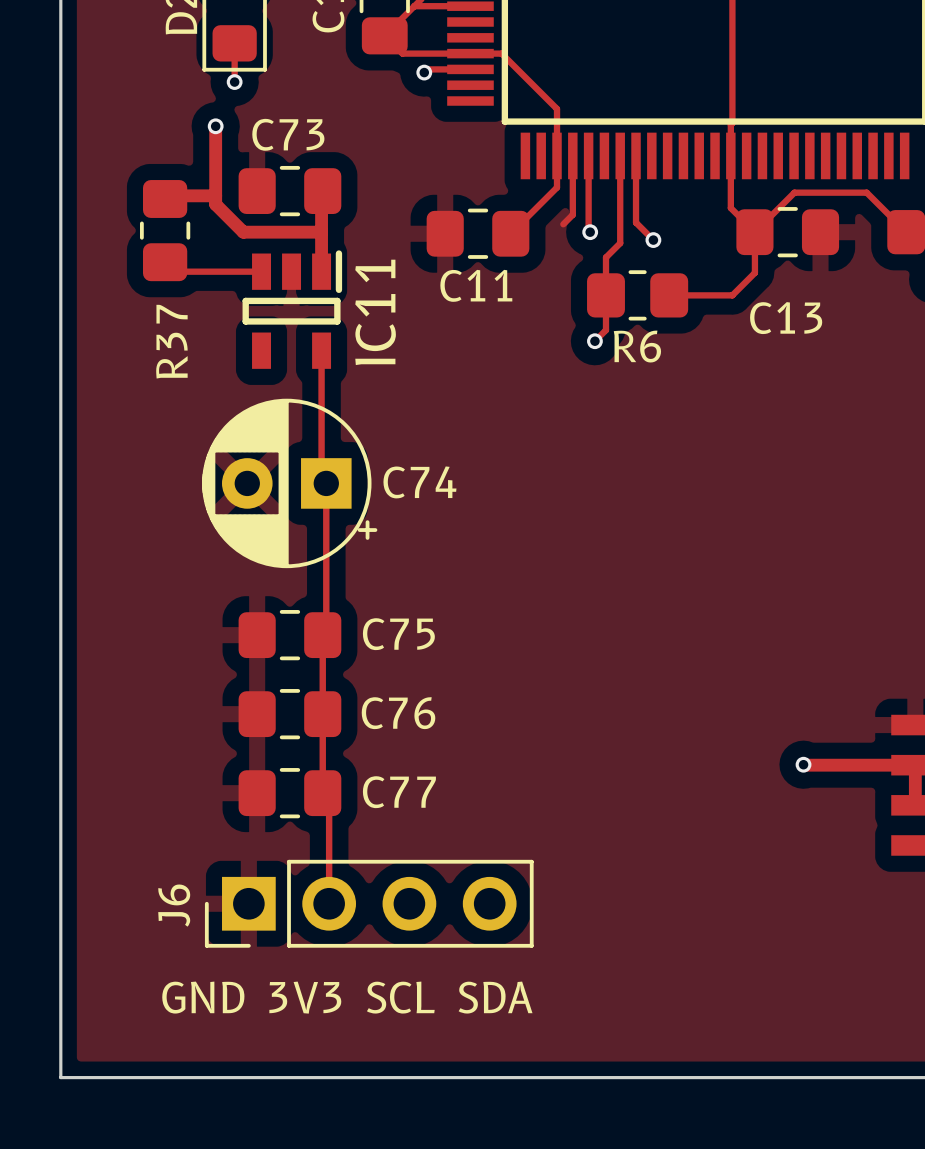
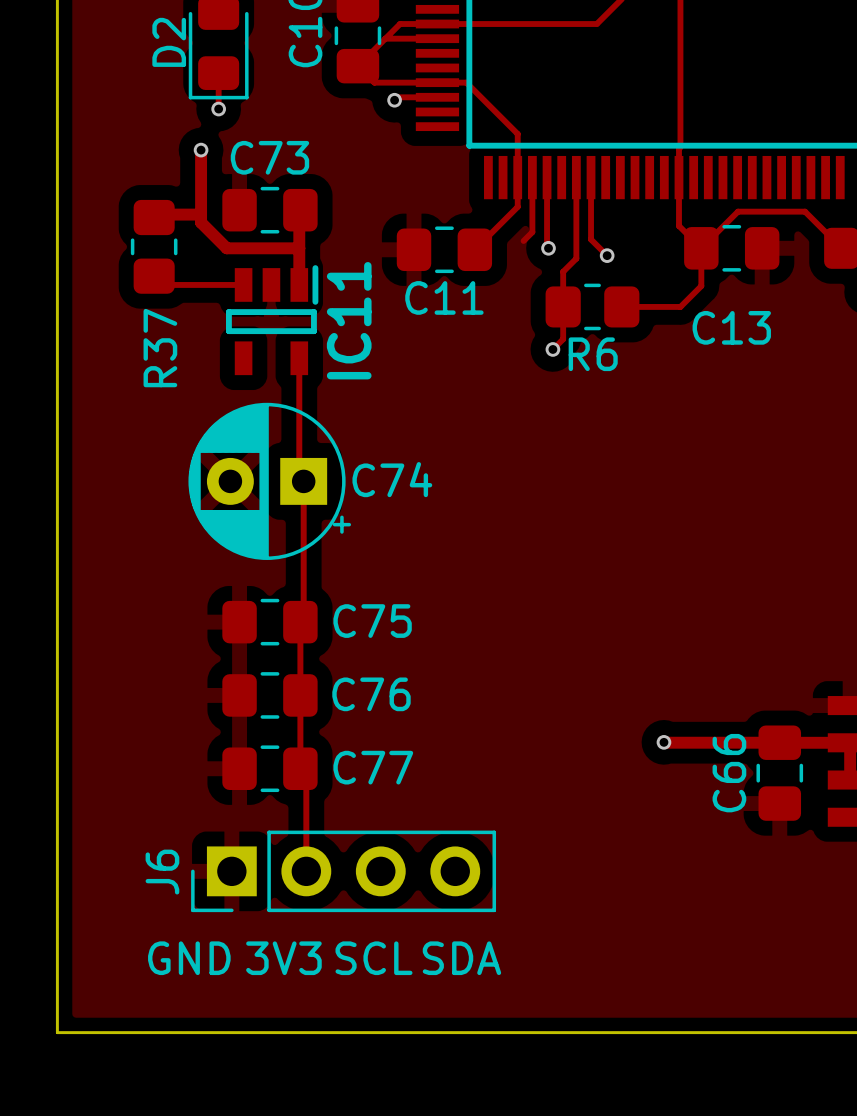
track: (803, 764) (839, 765) -> (664, 742) (779, 742)
via position: (803, 764) -> (663, 742)
C66: none -> (779, 773)

